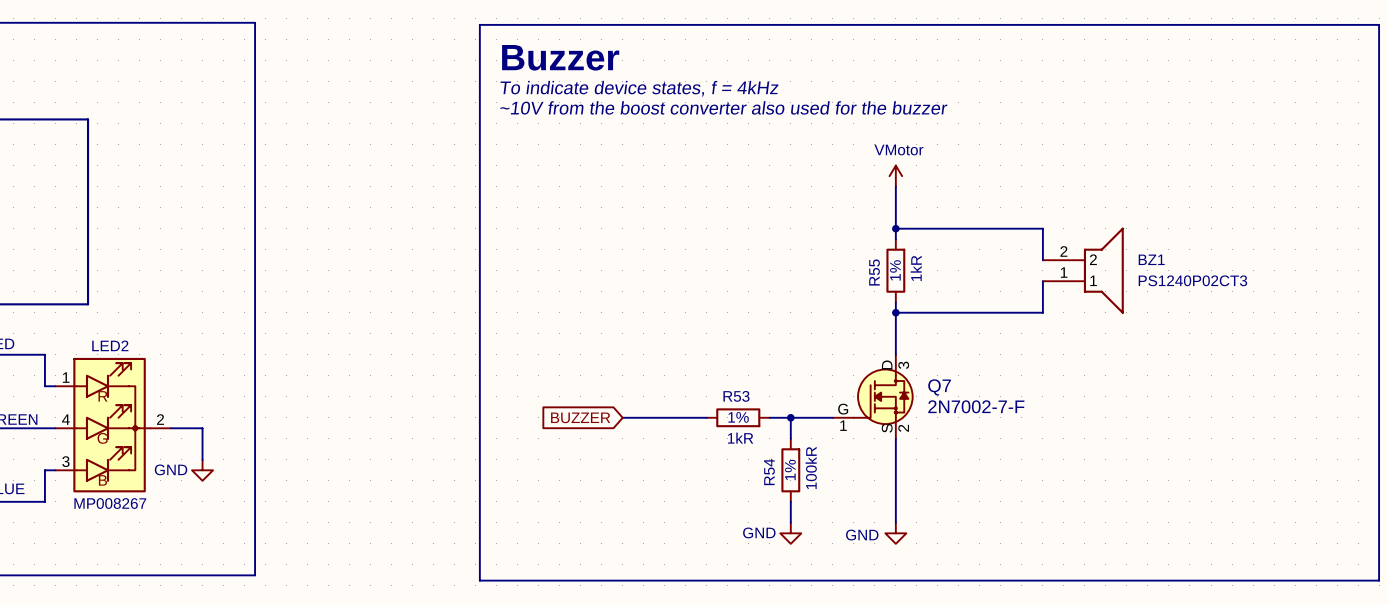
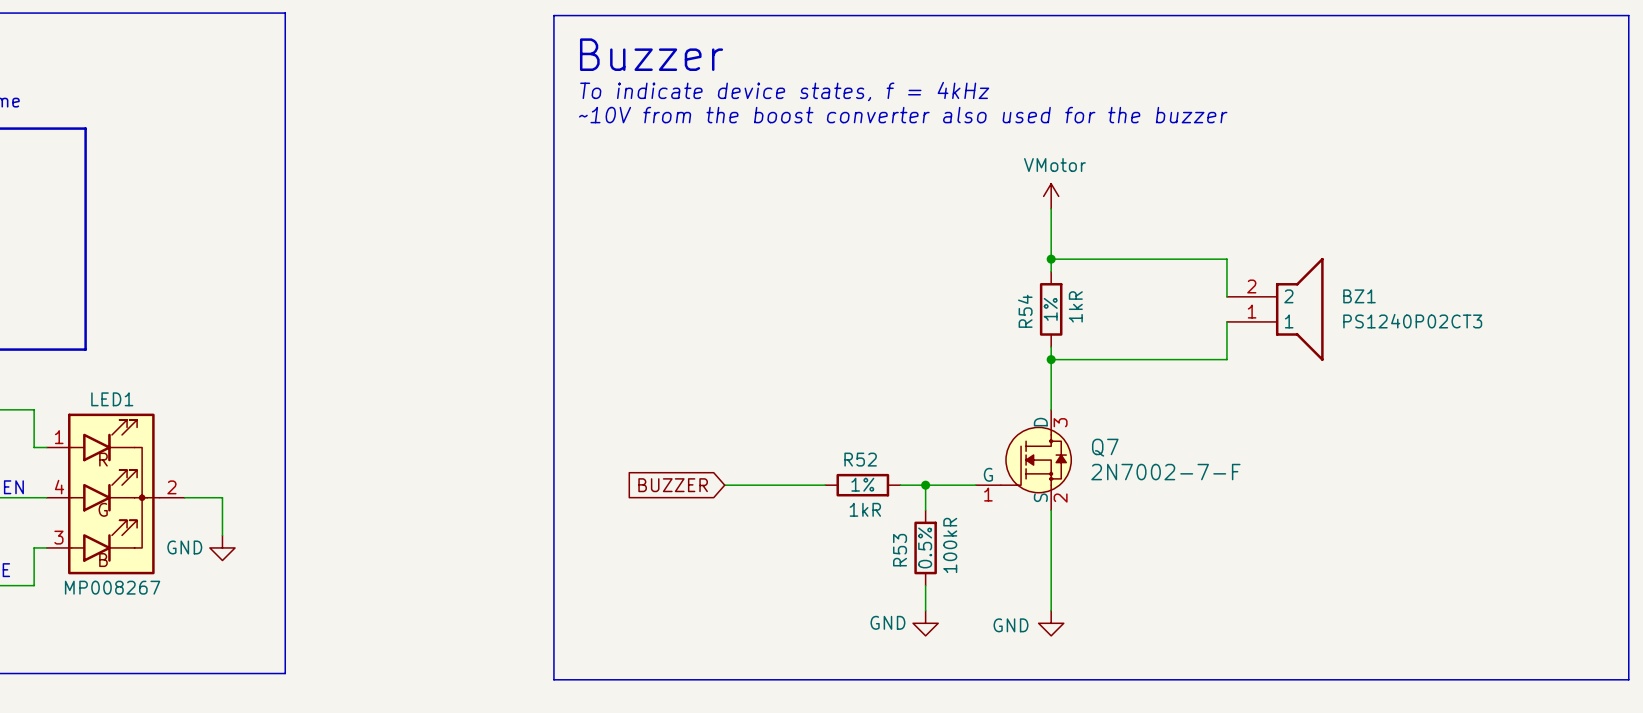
R55 name: R55 (874, 272) -> R54 (1025, 311)
LED2 name: LED2 (110, 345) -> LED1 (112, 399)
R53 name: R53 (736, 396) -> R52 (860, 459)
R54 text: 1% (790, 469) -> 0.5% (925, 547)
R54 name: R54 (769, 472) -> R53 (900, 550)

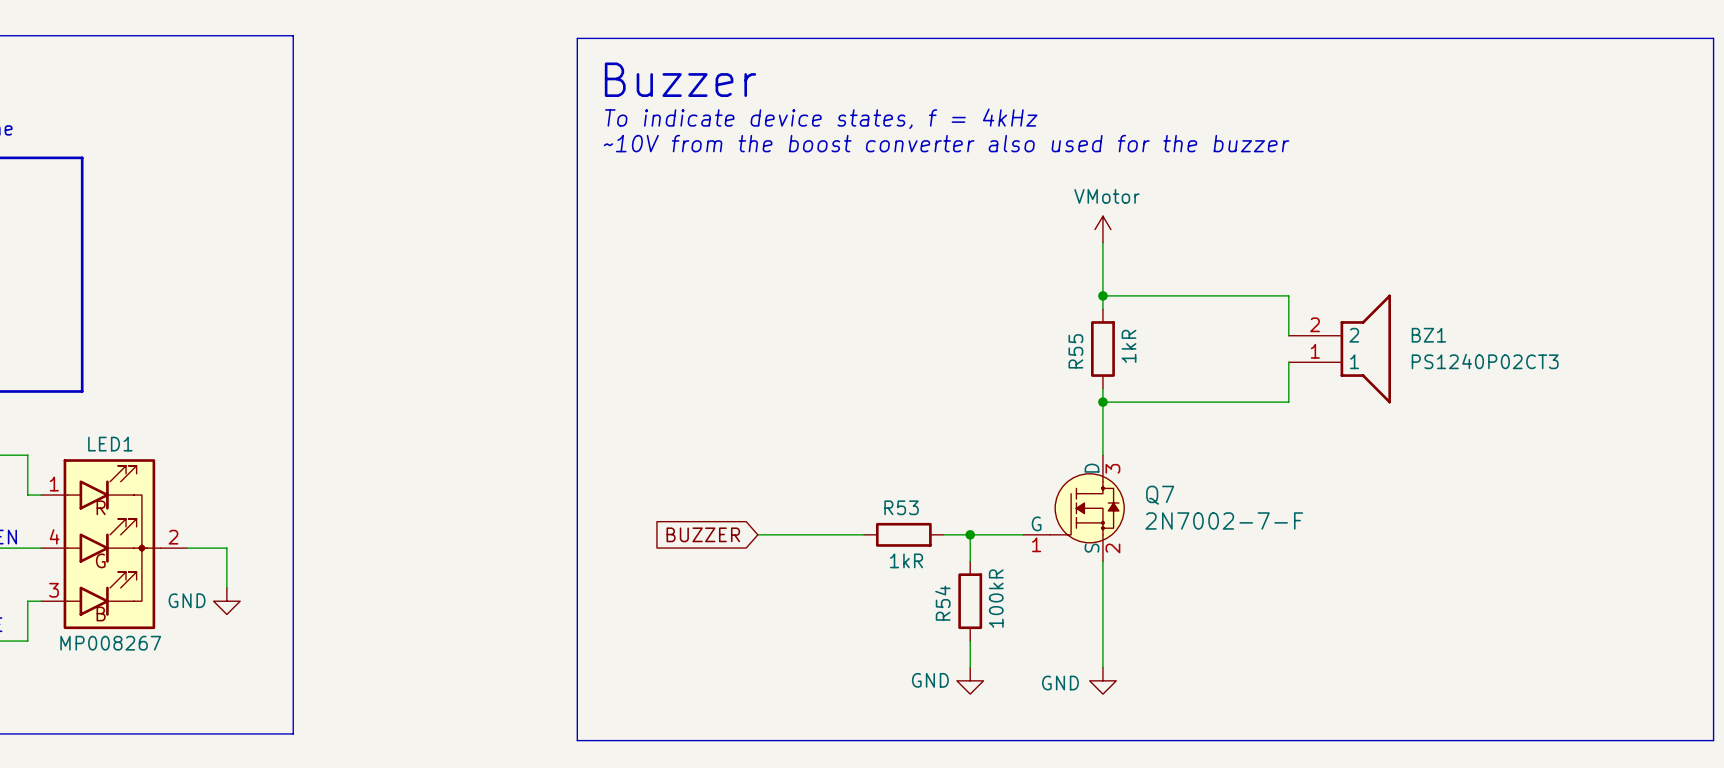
R54 text: 1% (1050, 309) -> none
R54 name: R54 (1025, 311) -> R55 (1075, 351)
R52 name: R52 (860, 459) -> R53 (901, 507)
R52 text: 1% (862, 484) -> none
R53 text: 0.5% (925, 547) -> none
R53 name: R53 (900, 550) -> R54 (942, 603)

